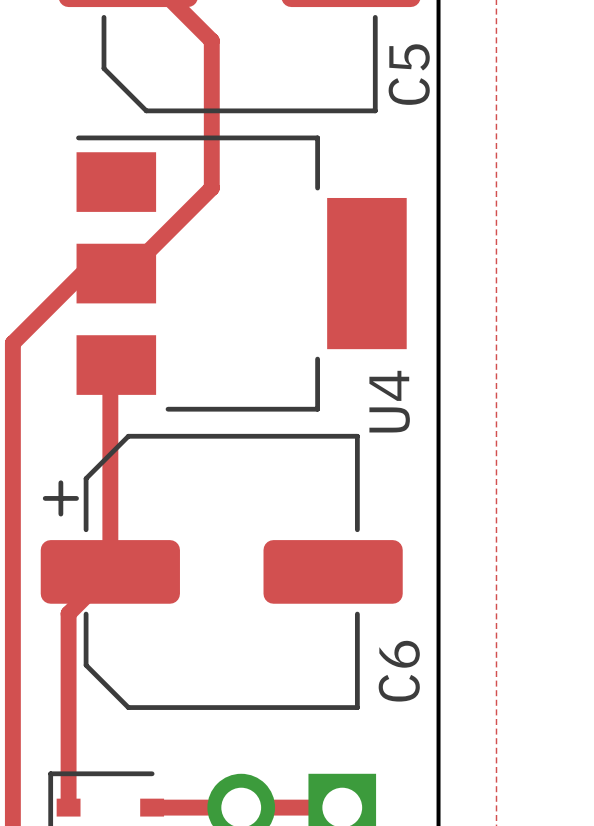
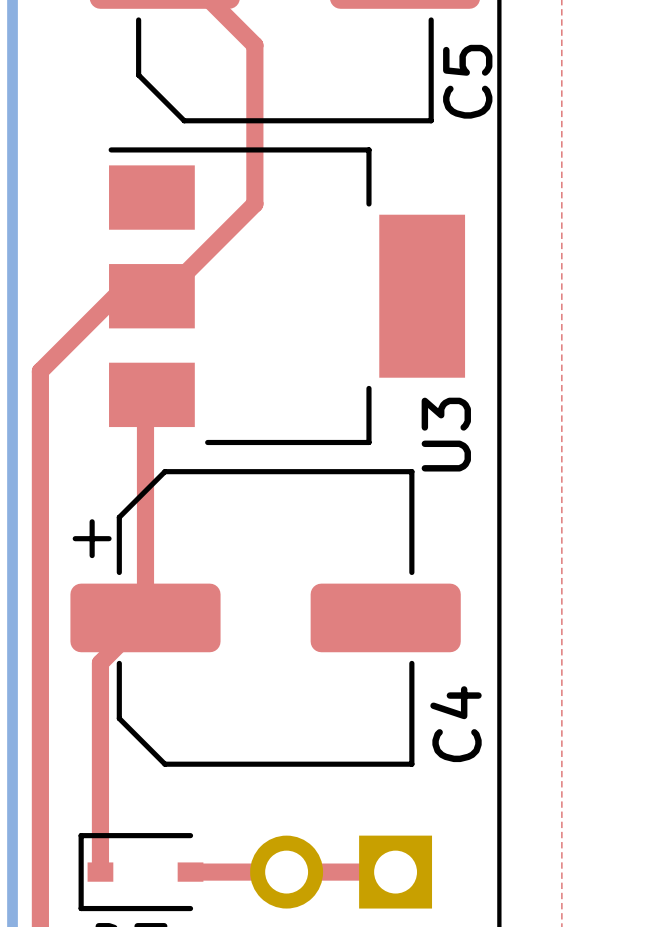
U4 name: U4 (389, 401) -> U3 (446, 434)
C6 name: C6 (399, 671) -> C4 (456, 724)

